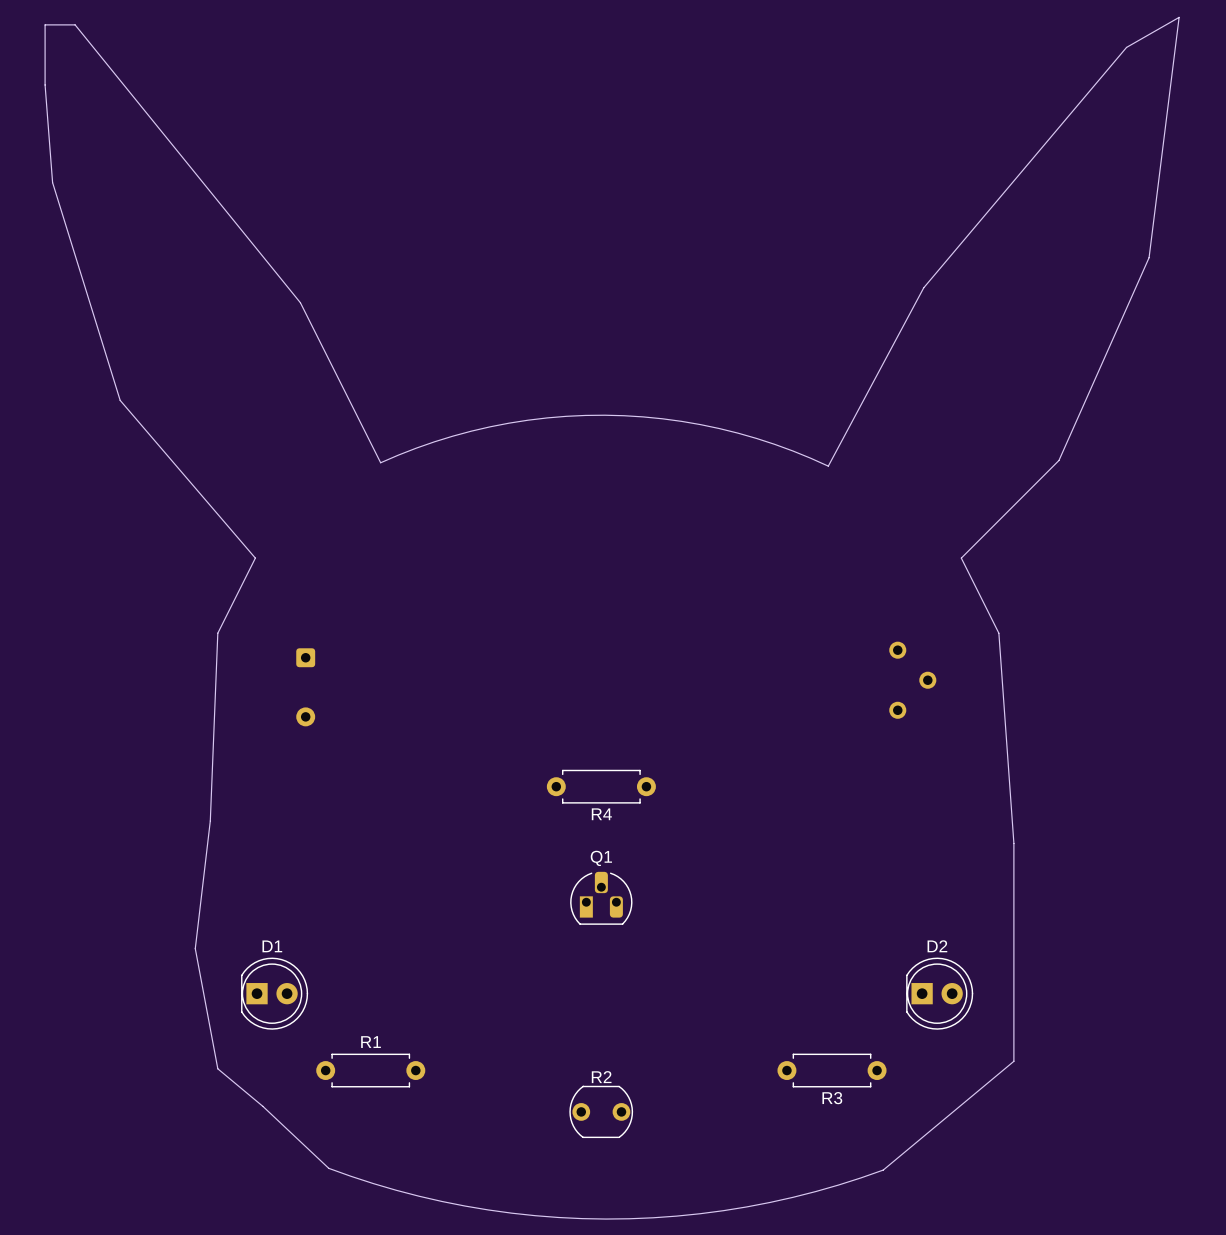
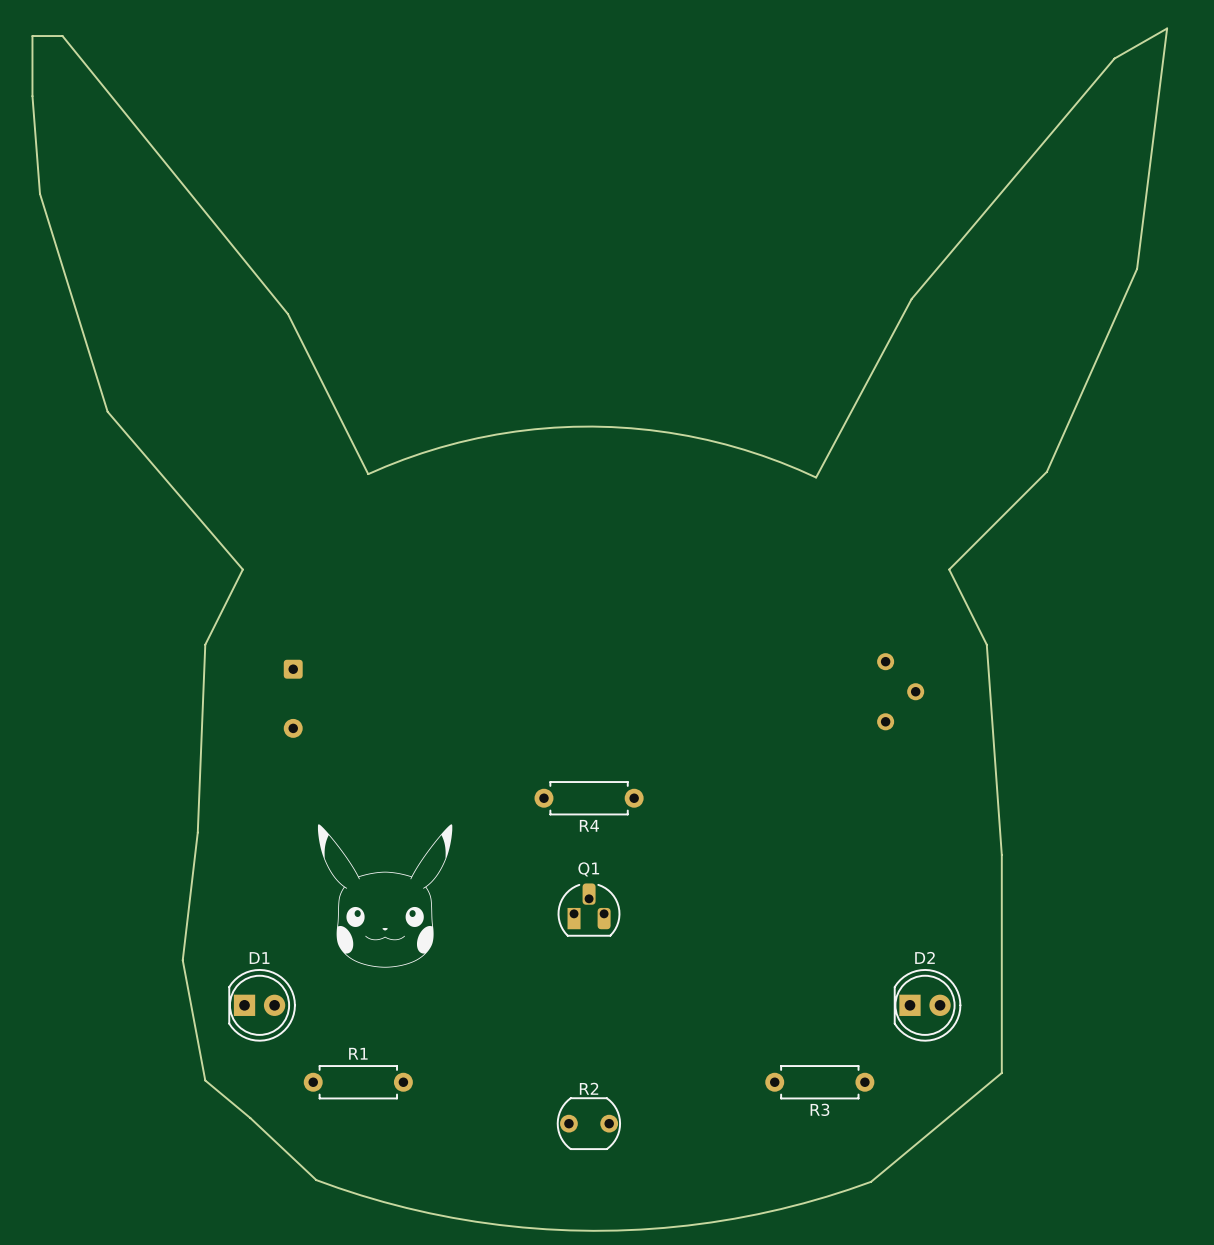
drawing: none -> [317, 824, 453, 968]

